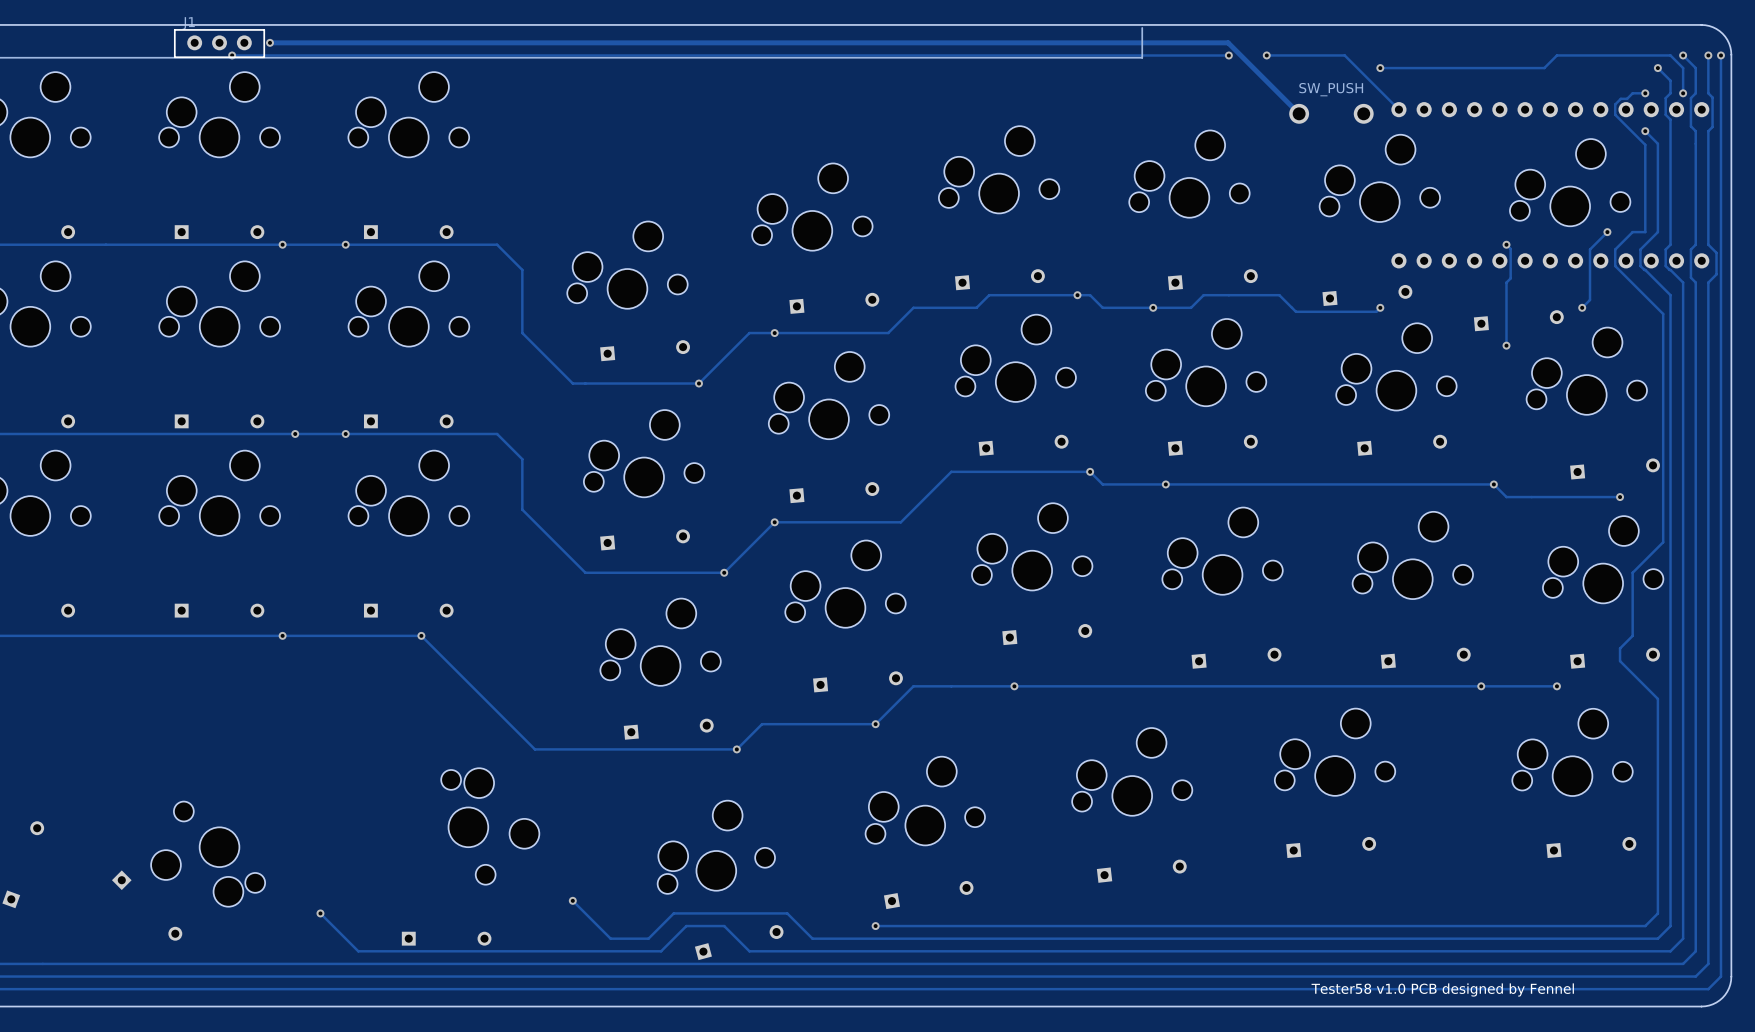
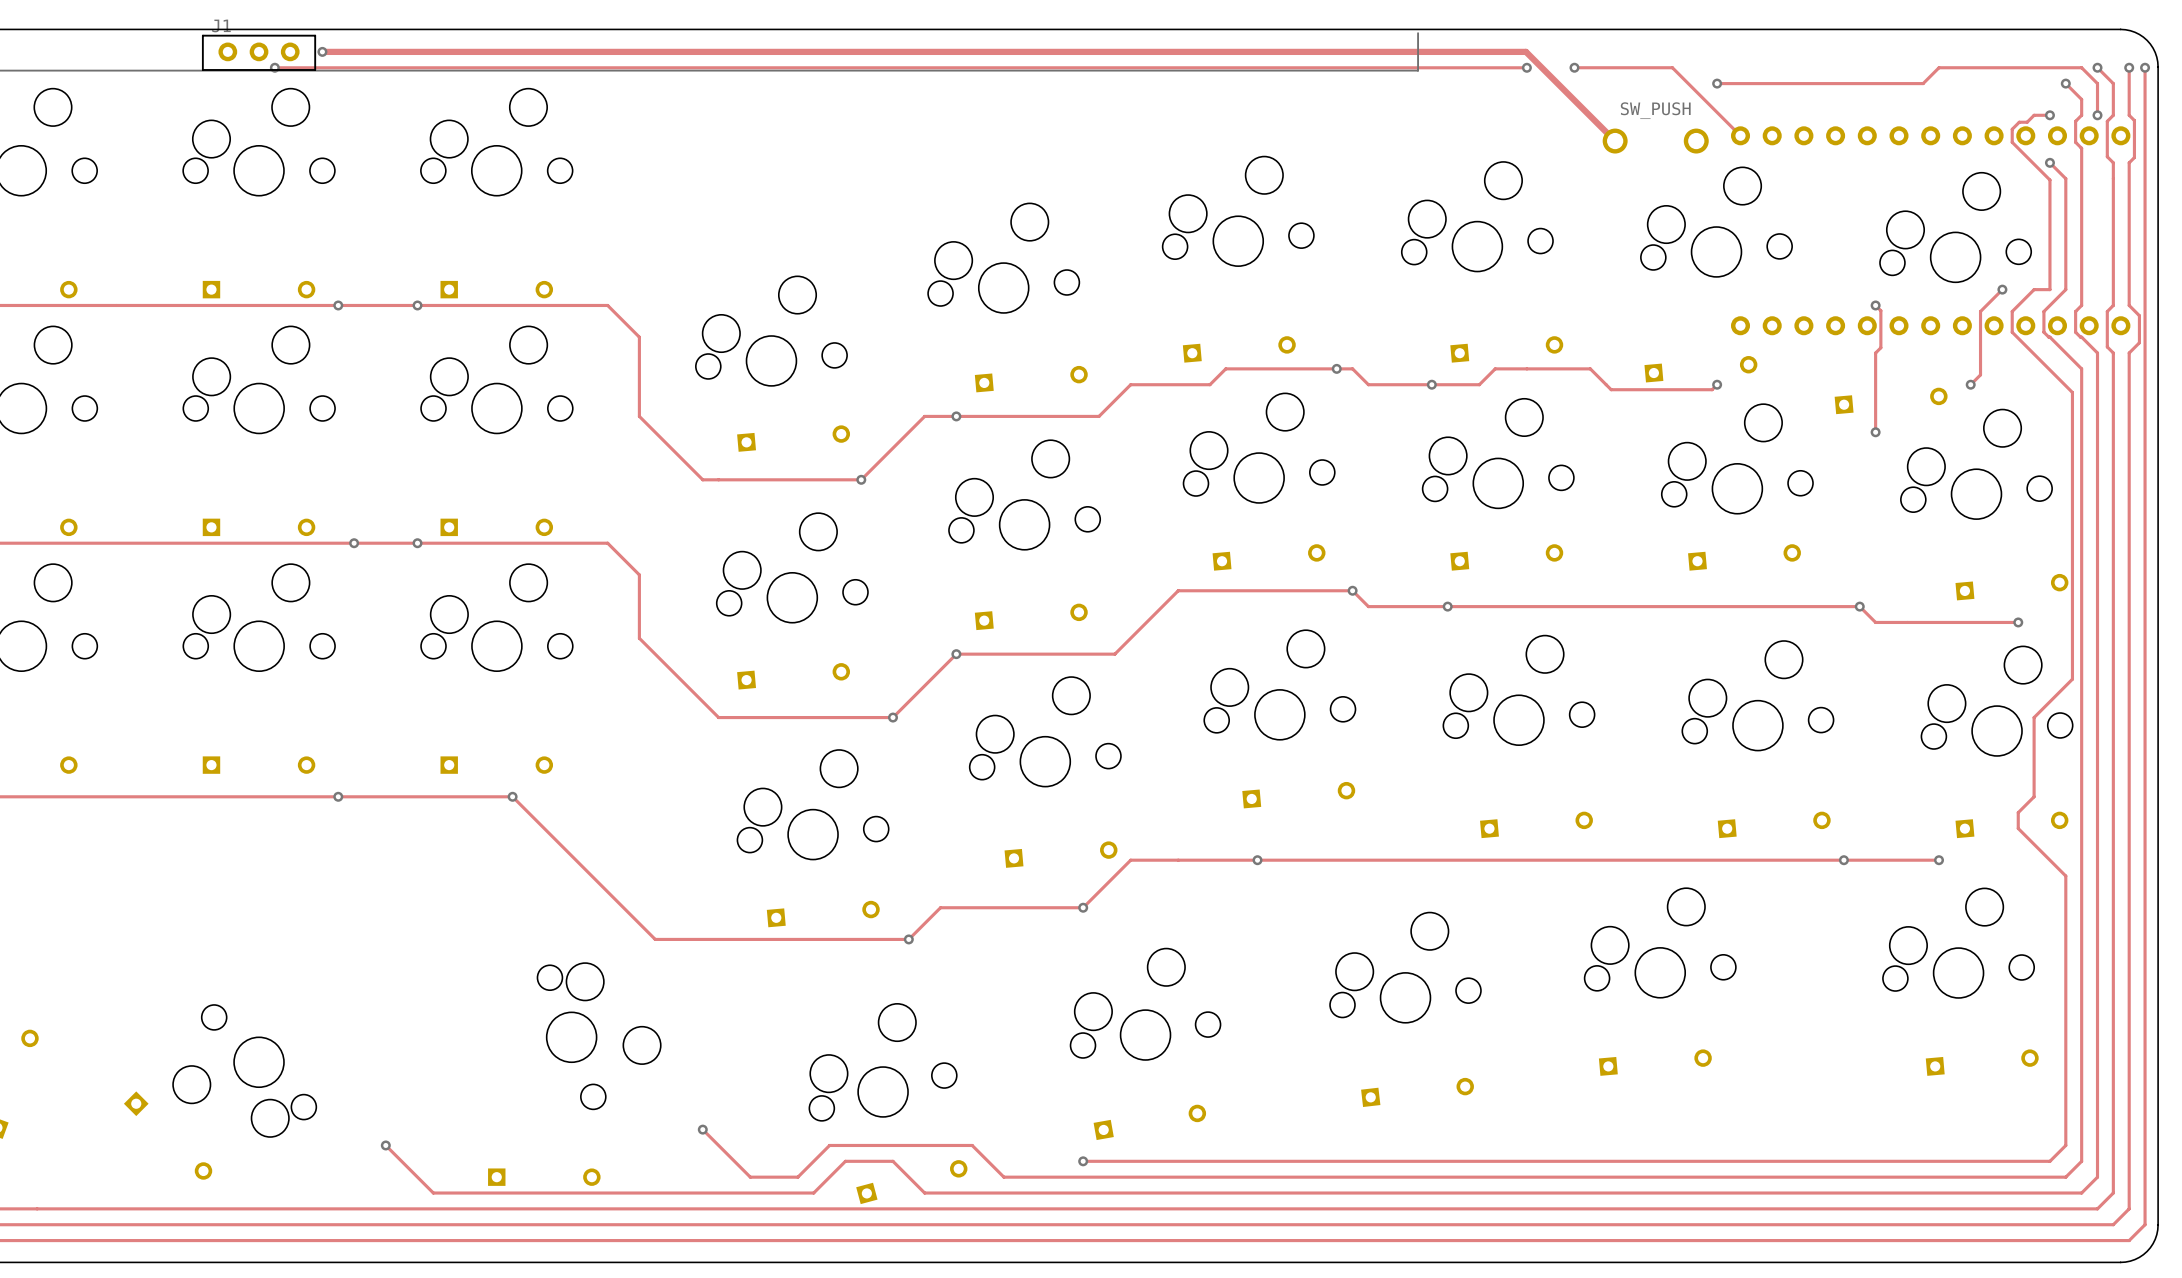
text: Tester58 v1.0 PCB designed by Fennel (1442, 989) -> none

